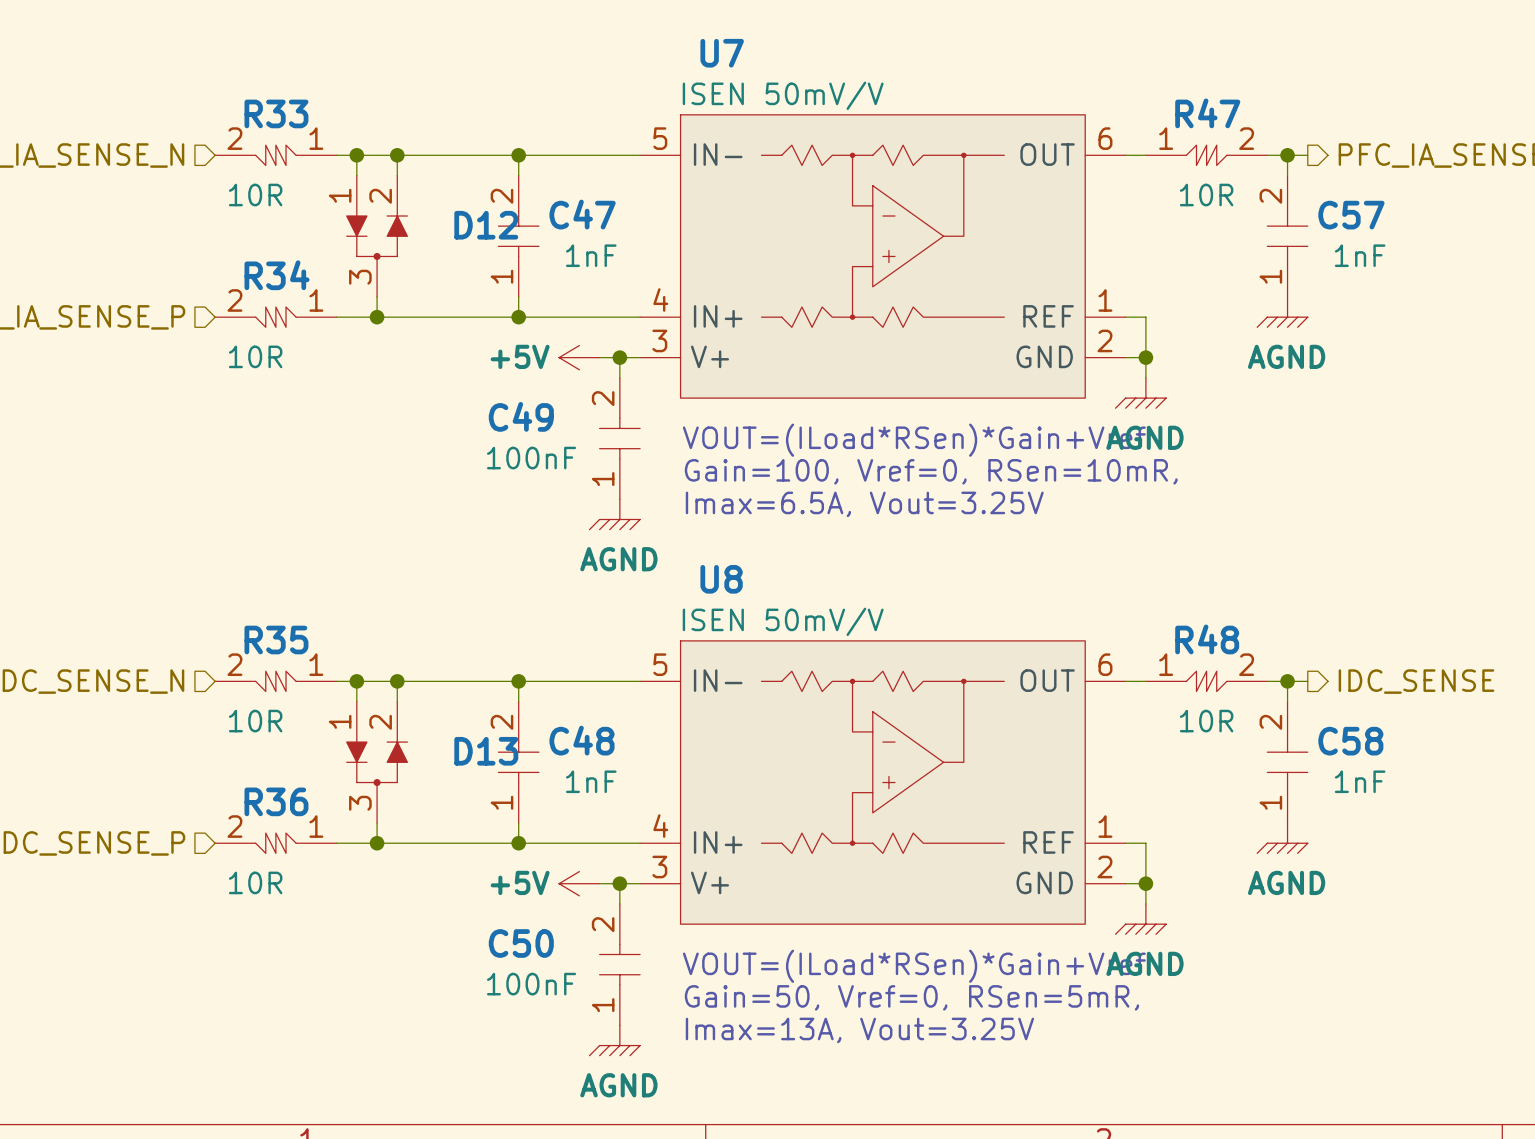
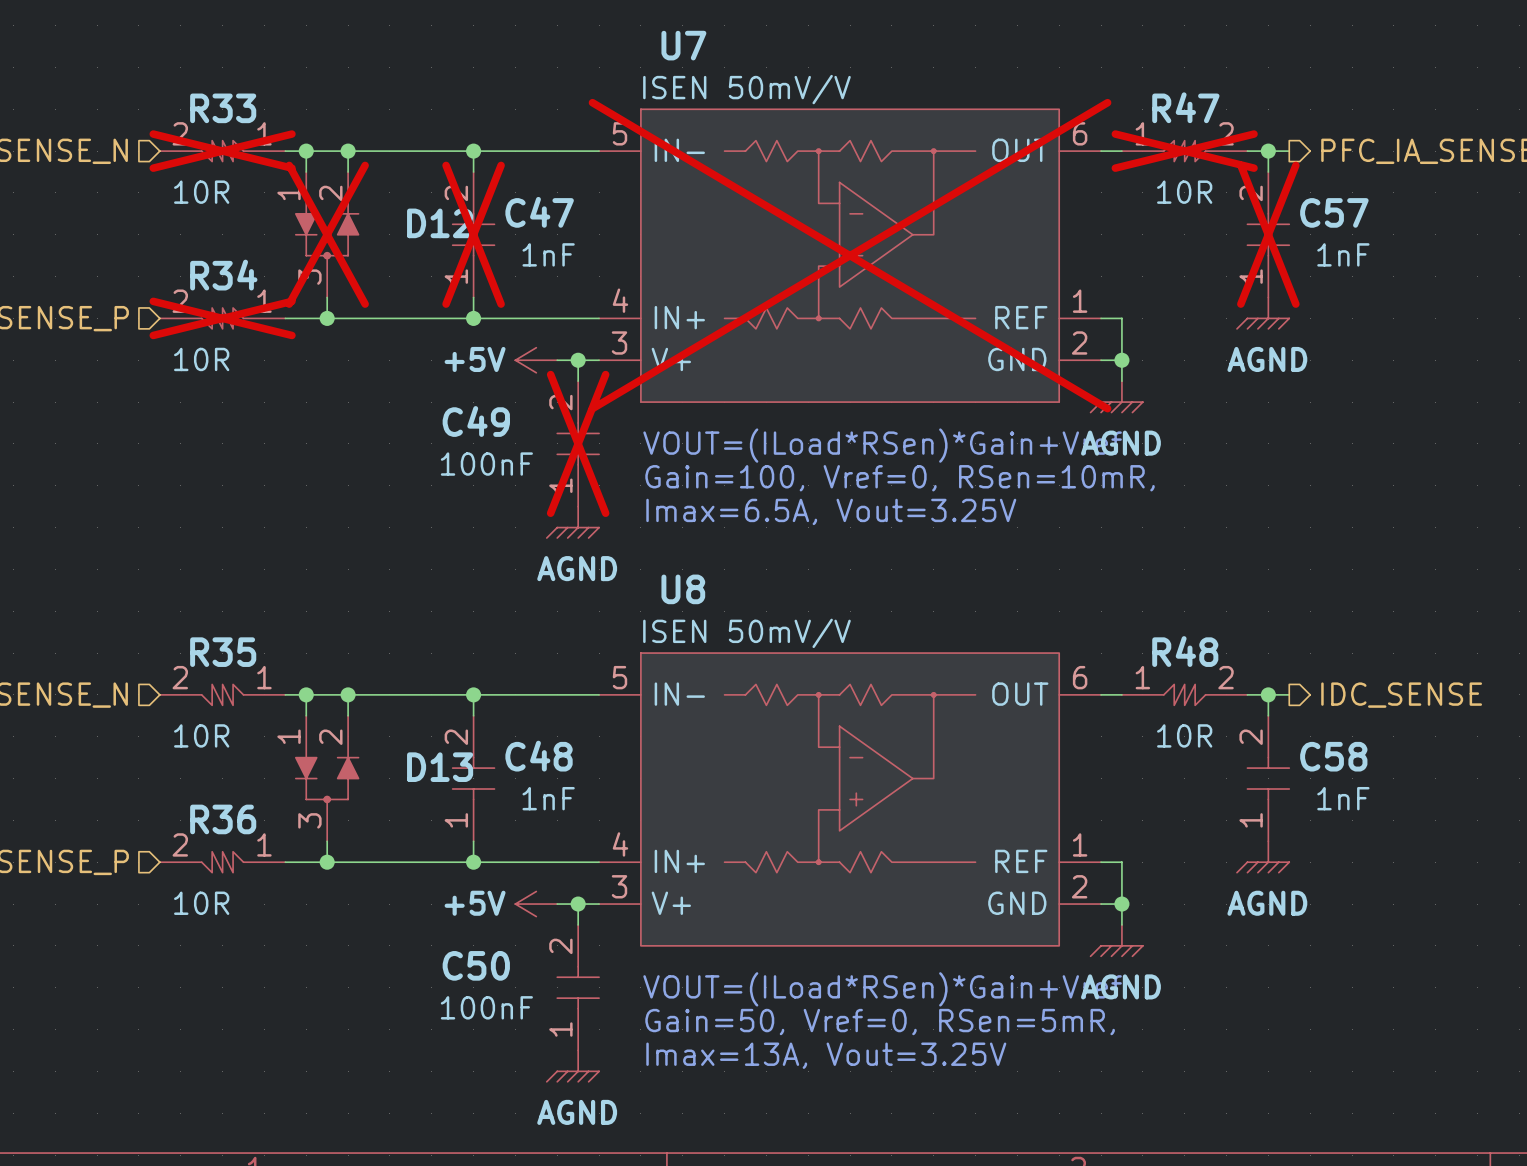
R33 do-not-place cross: none -> (222, 151)
R47 do-not-place cross: none -> (1184, 151)
D12 do-not-place cross: none -> (327, 234)
C47 do-not-place cross: none -> (473, 234)
C57 do-not-place cross: none -> (1268, 234)
U7 do-not-place cross: none -> (850, 255)
R34 do-not-place cross: none -> (222, 318)
C49 do-not-place cross: none -> (578, 443)

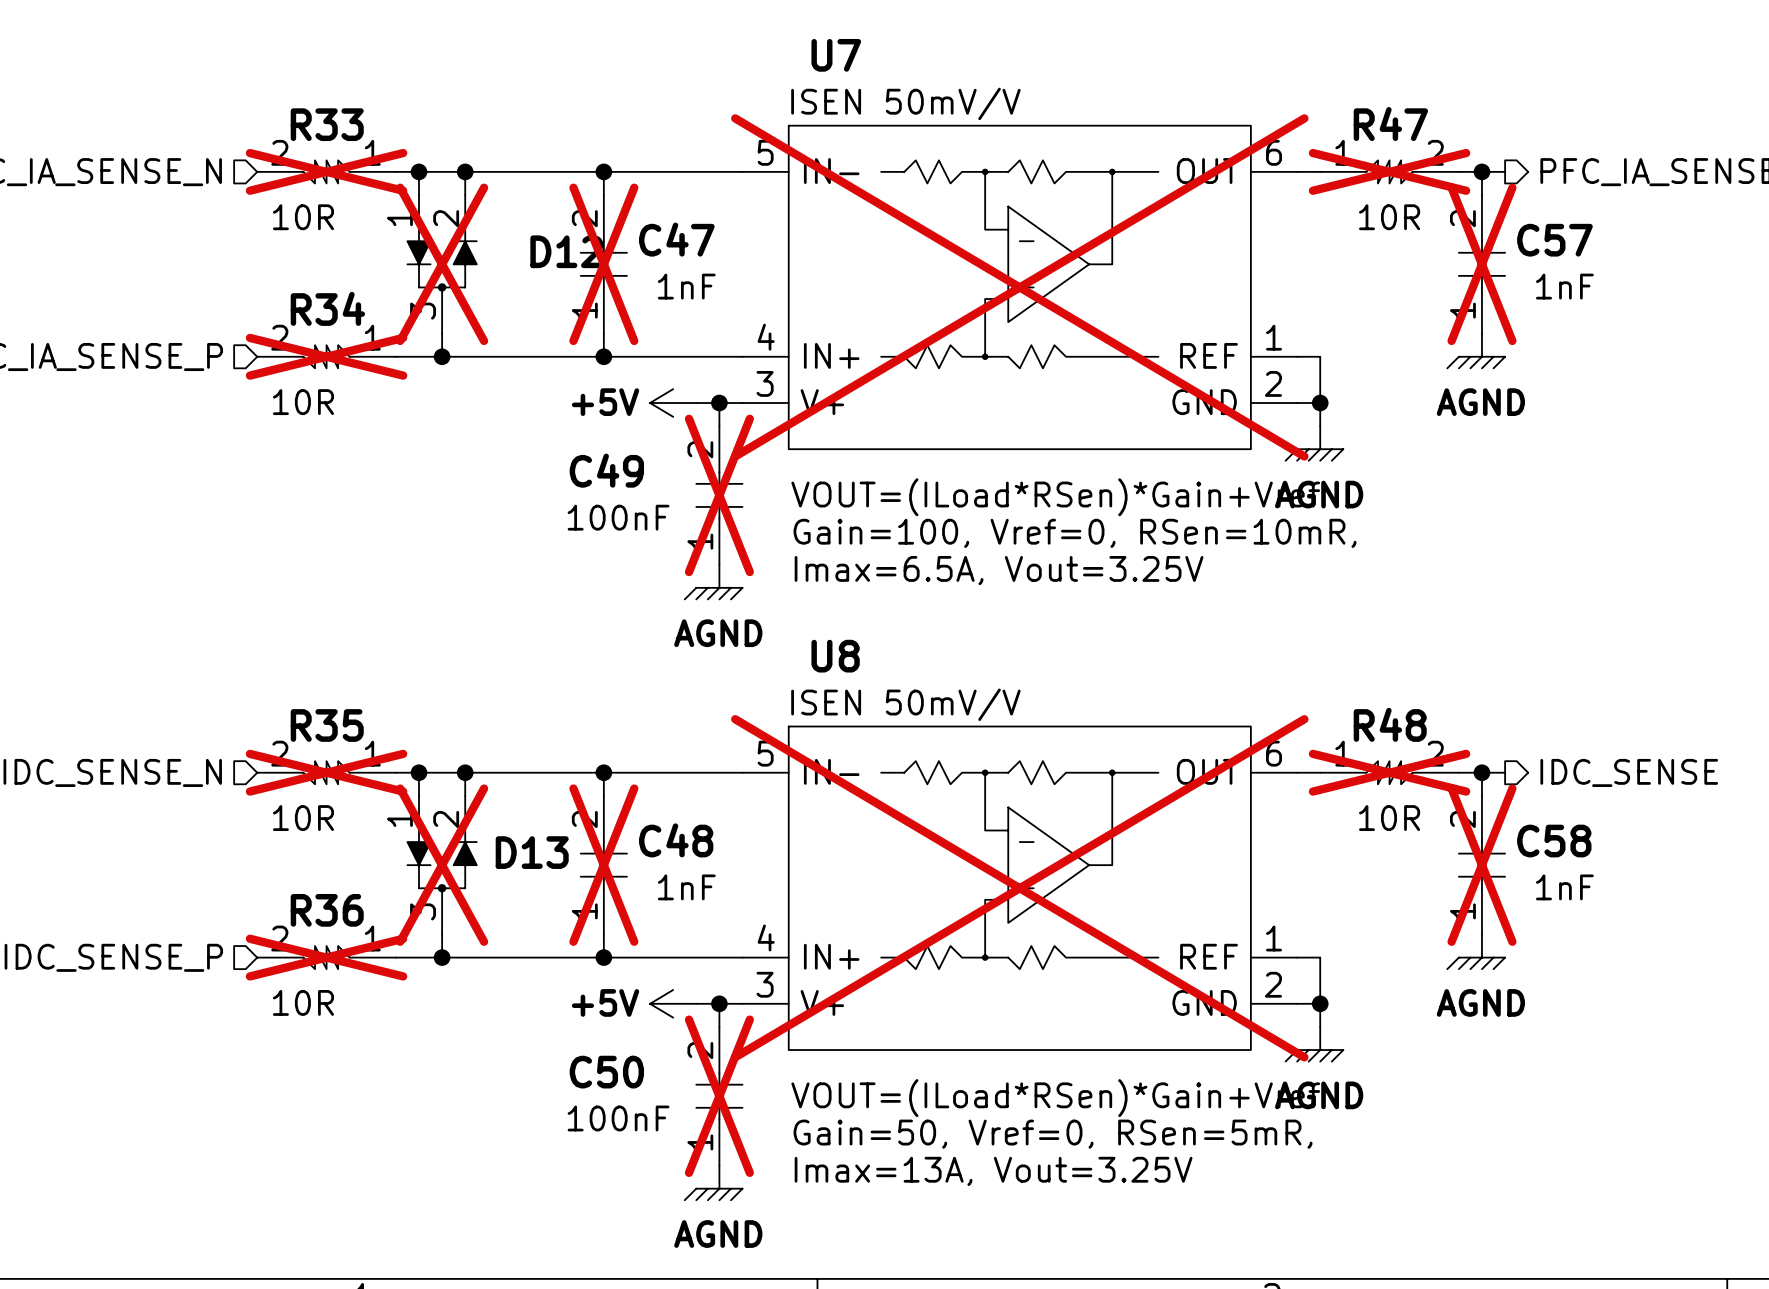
R35 do-not-place cross: none -> (326, 772)
R48 do-not-place cross: none -> (1389, 772)
D13 name position: D13 (440, 767) -> D13 (532, 852)
D13 do-not-place cross: none -> (442, 865)
C48 do-not-place cross: none -> (603, 865)
C58 do-not-place cross: none -> (1481, 865)
U8 do-not-place cross: none -> (1019, 888)
R36 do-not-place cross: none -> (326, 957)
C50 do-not-place cross: none -> (719, 1096)

